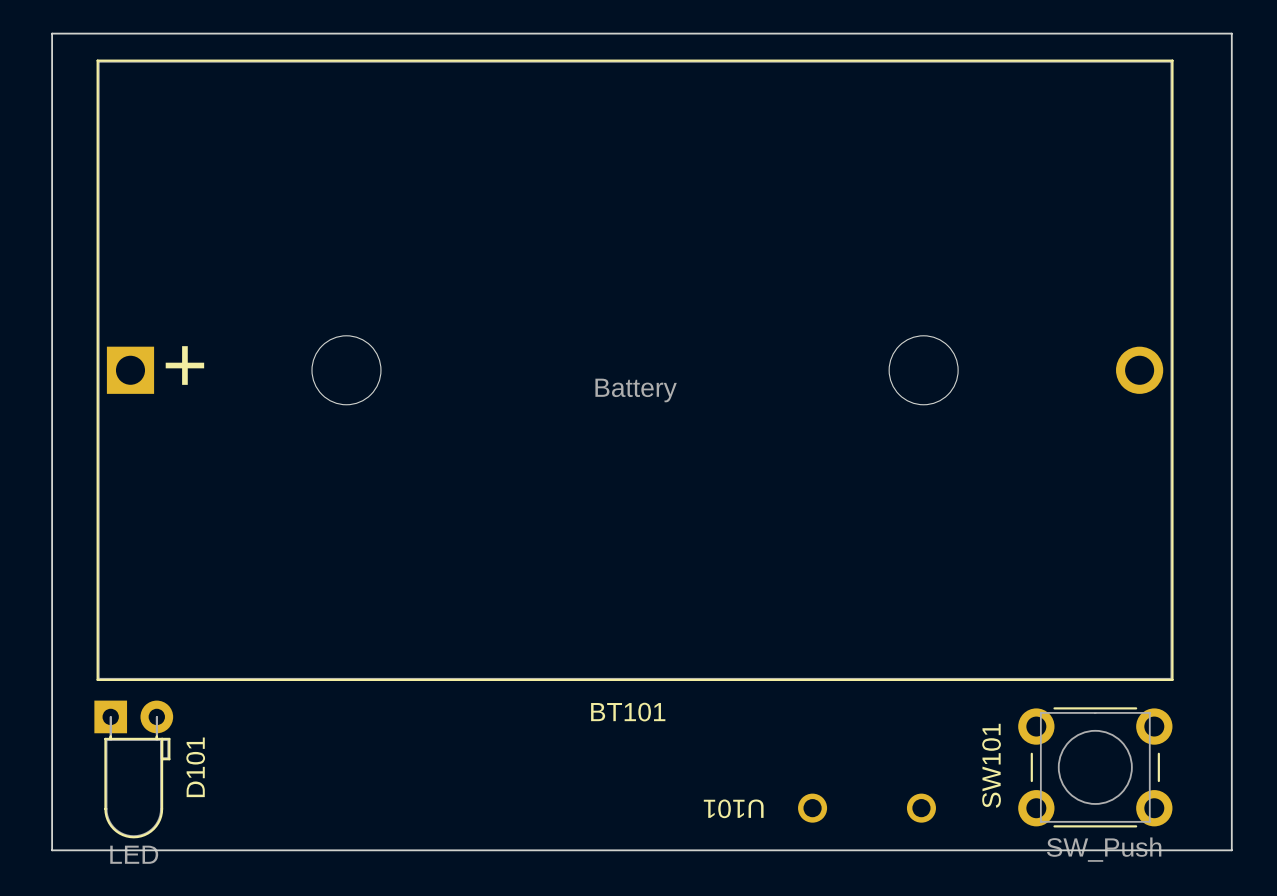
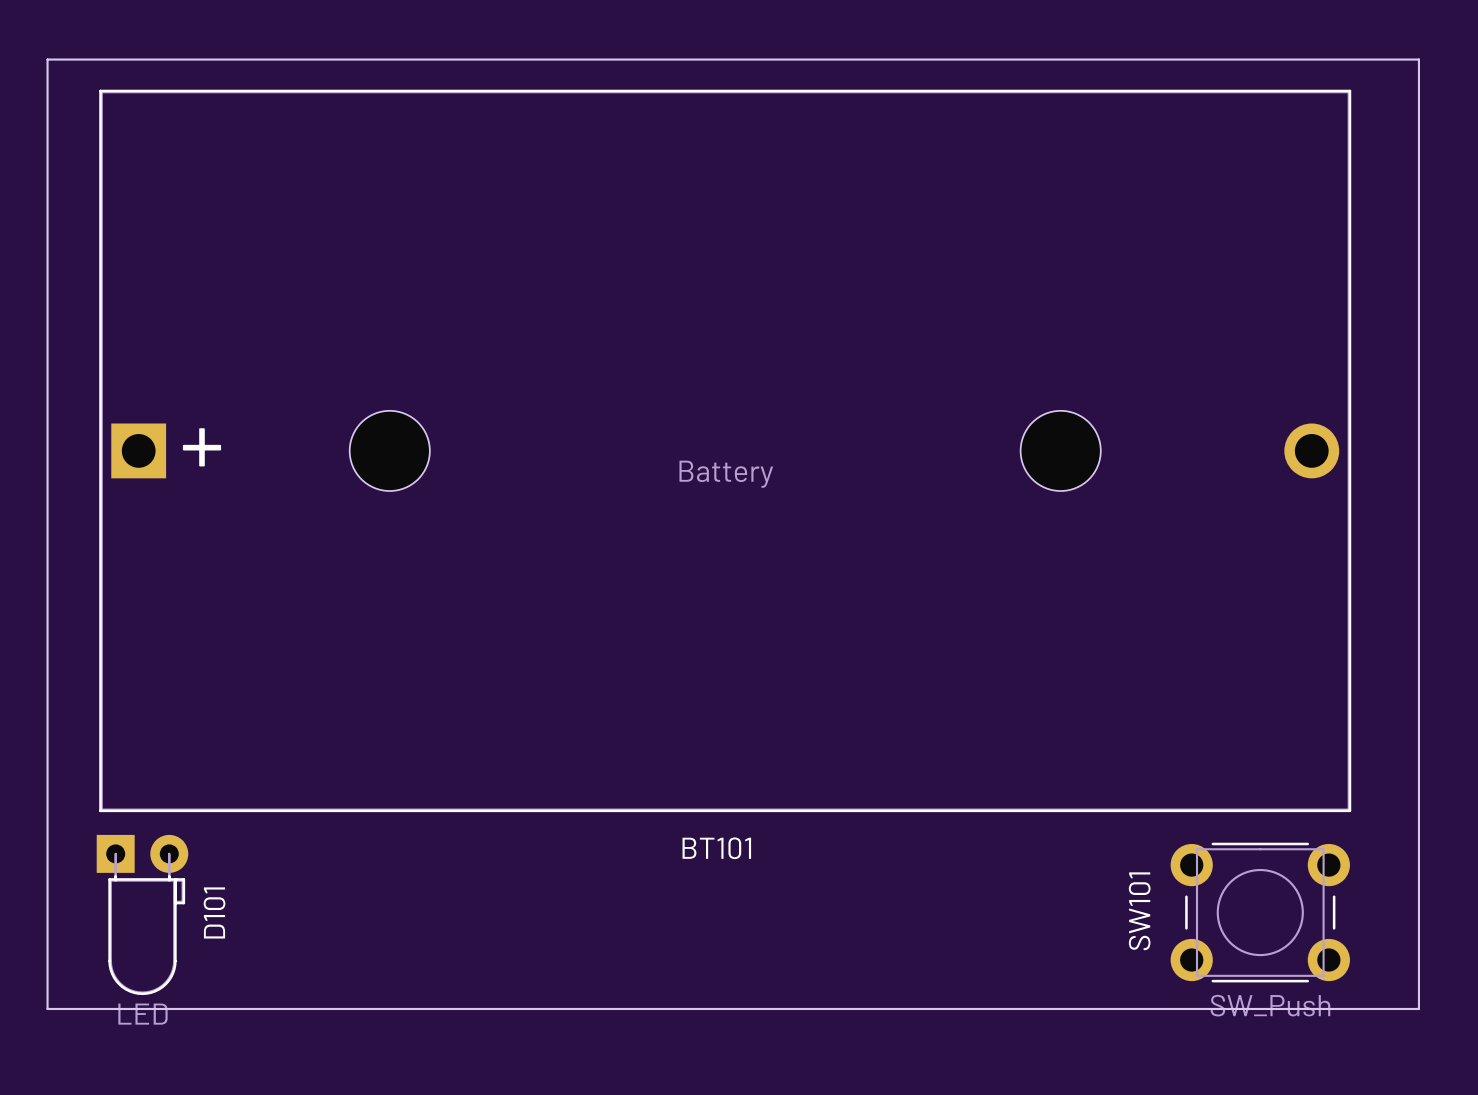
U101: (867, 808) -> none

